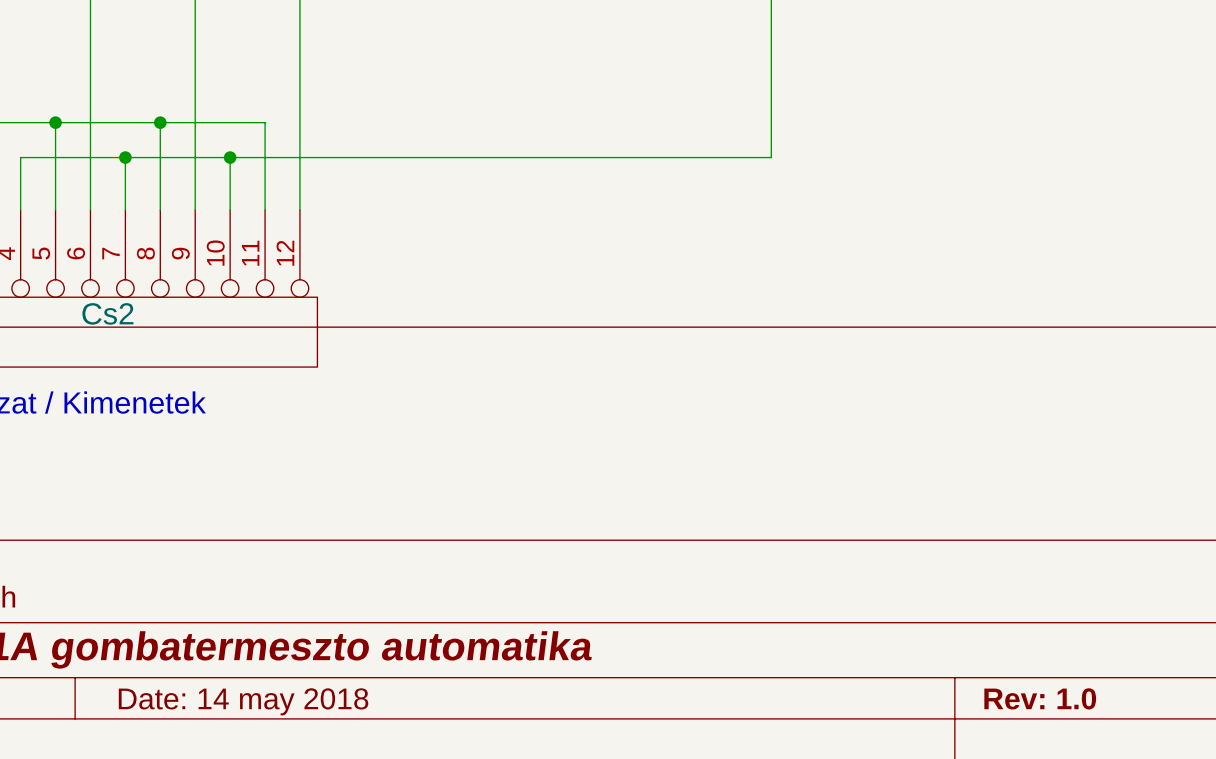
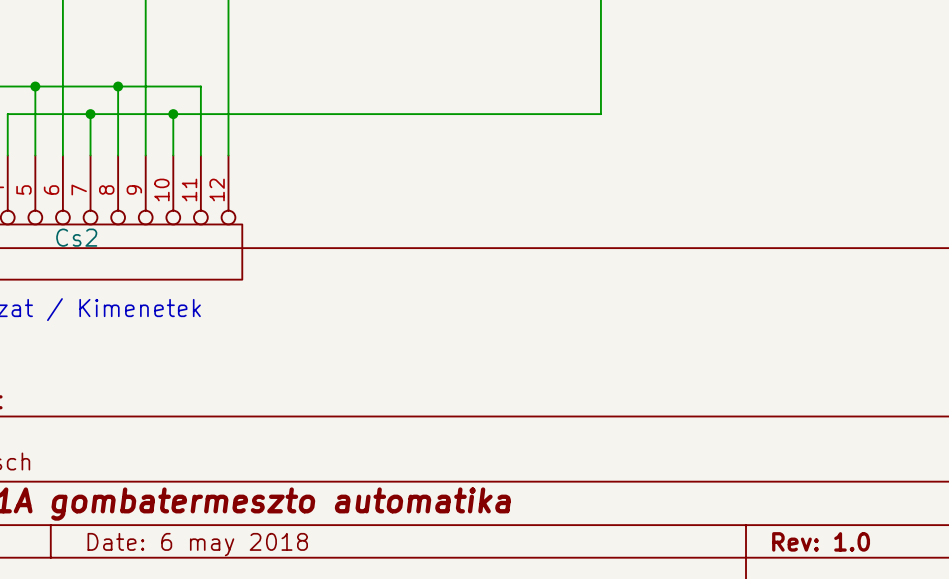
title block: Date: 14 may 2018 (243, 701) -> Date: 6 may 2018 (197, 544)

